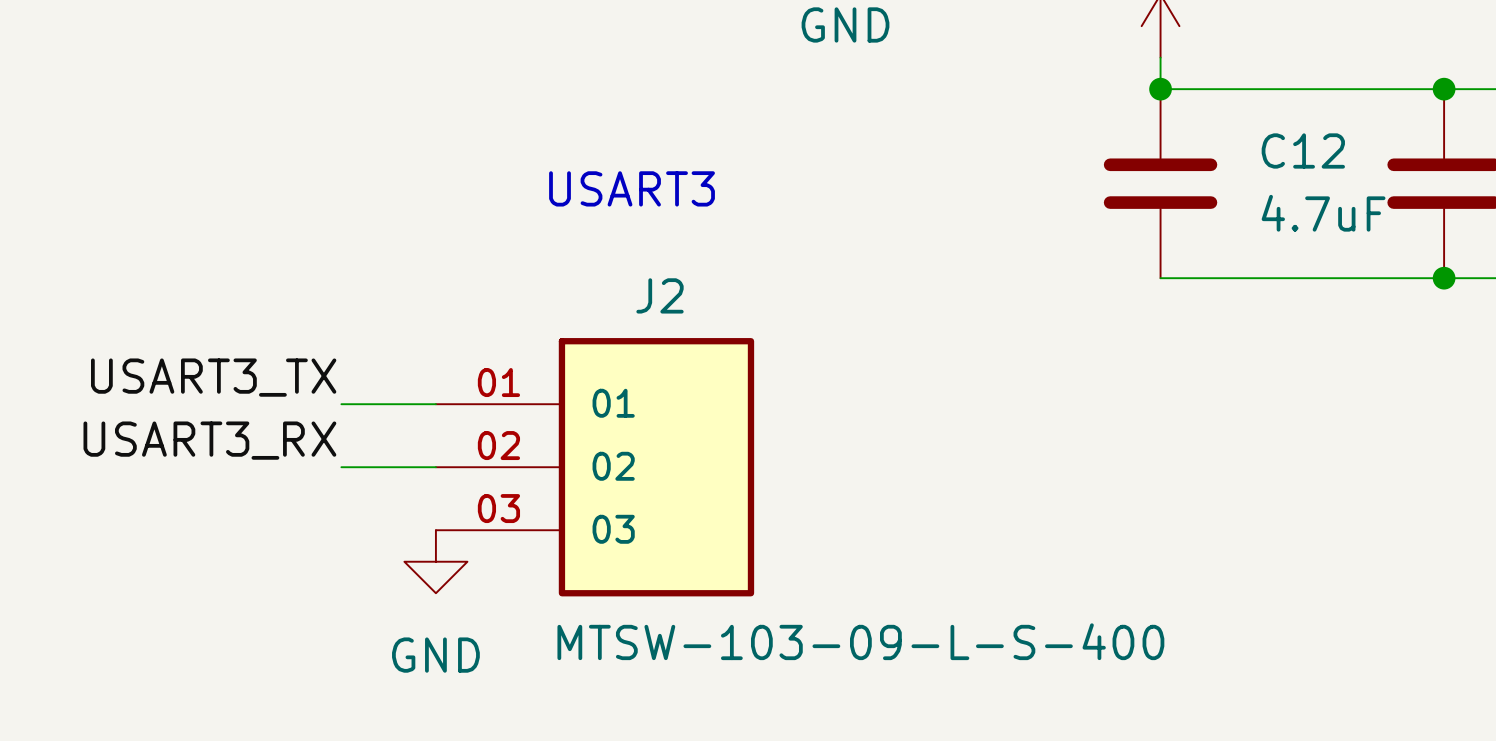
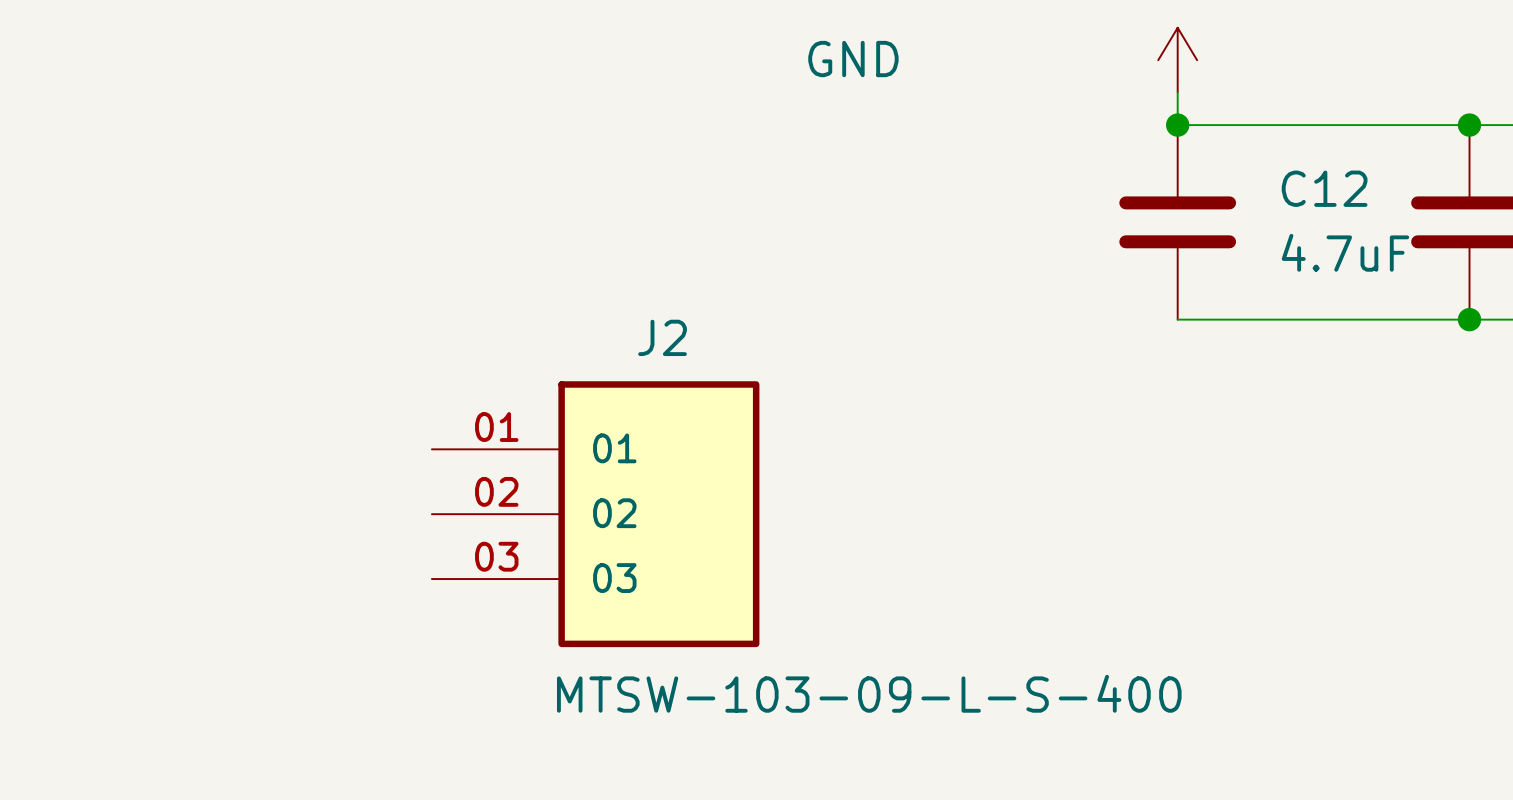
text: USART3 (632, 188) -> none
label: USART3_TX (213, 377) -> none
wire: (341, 404) (435, 404) -> none
label: USART3_RX (209, 440) -> none
wire: (341, 467) (435, 467) -> none
power symbol: GND (435, 561) -> none

